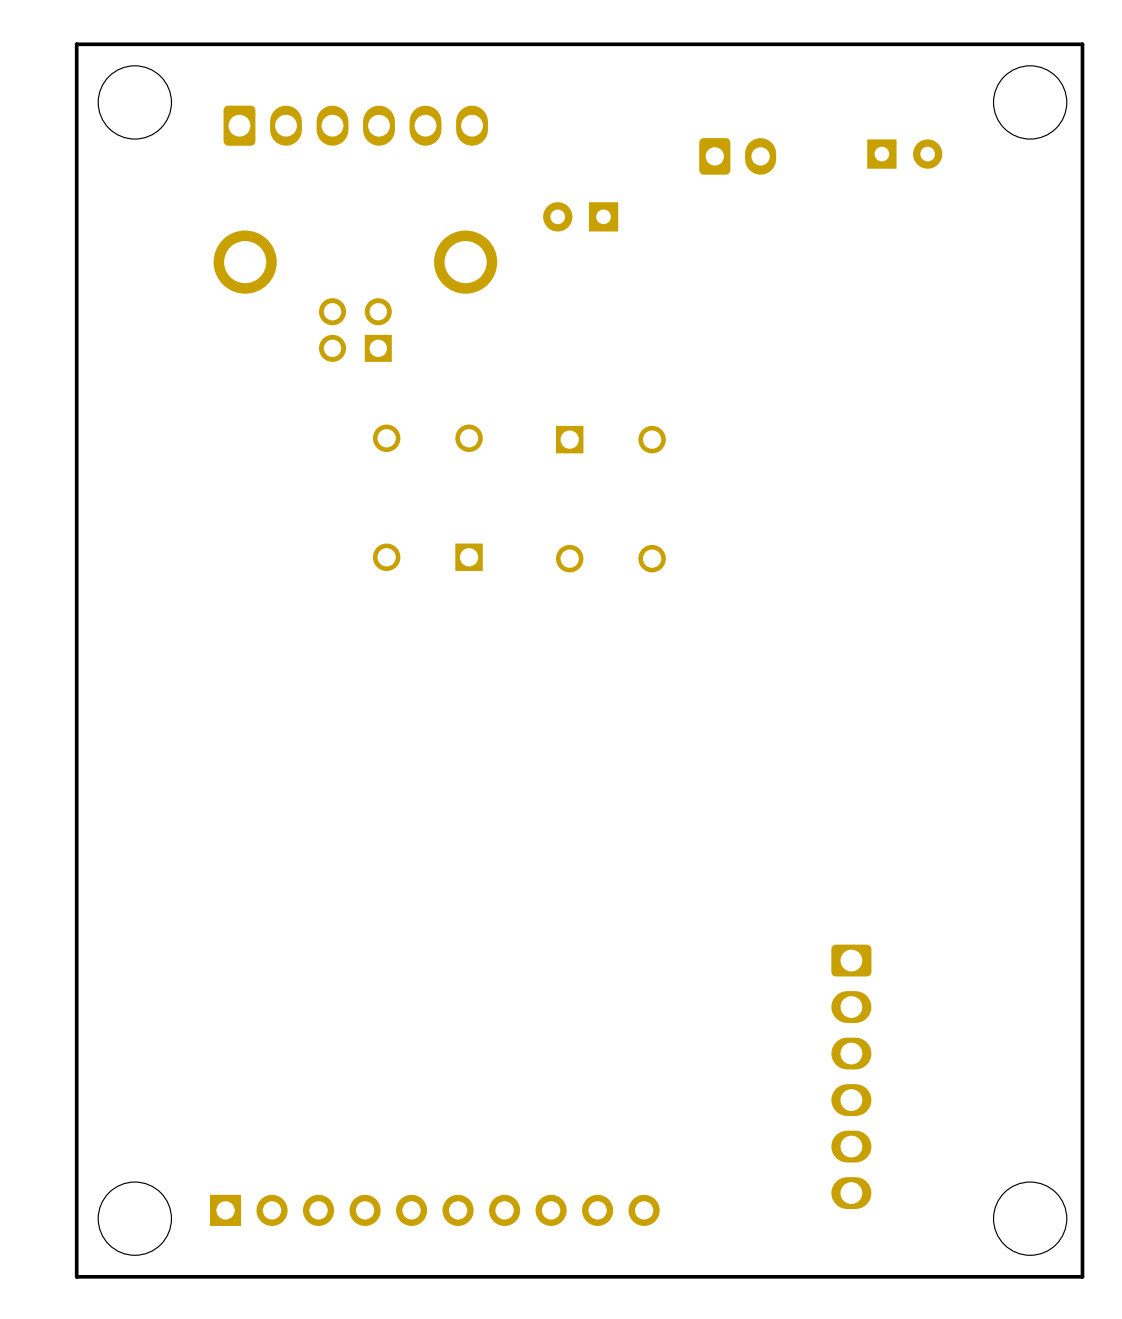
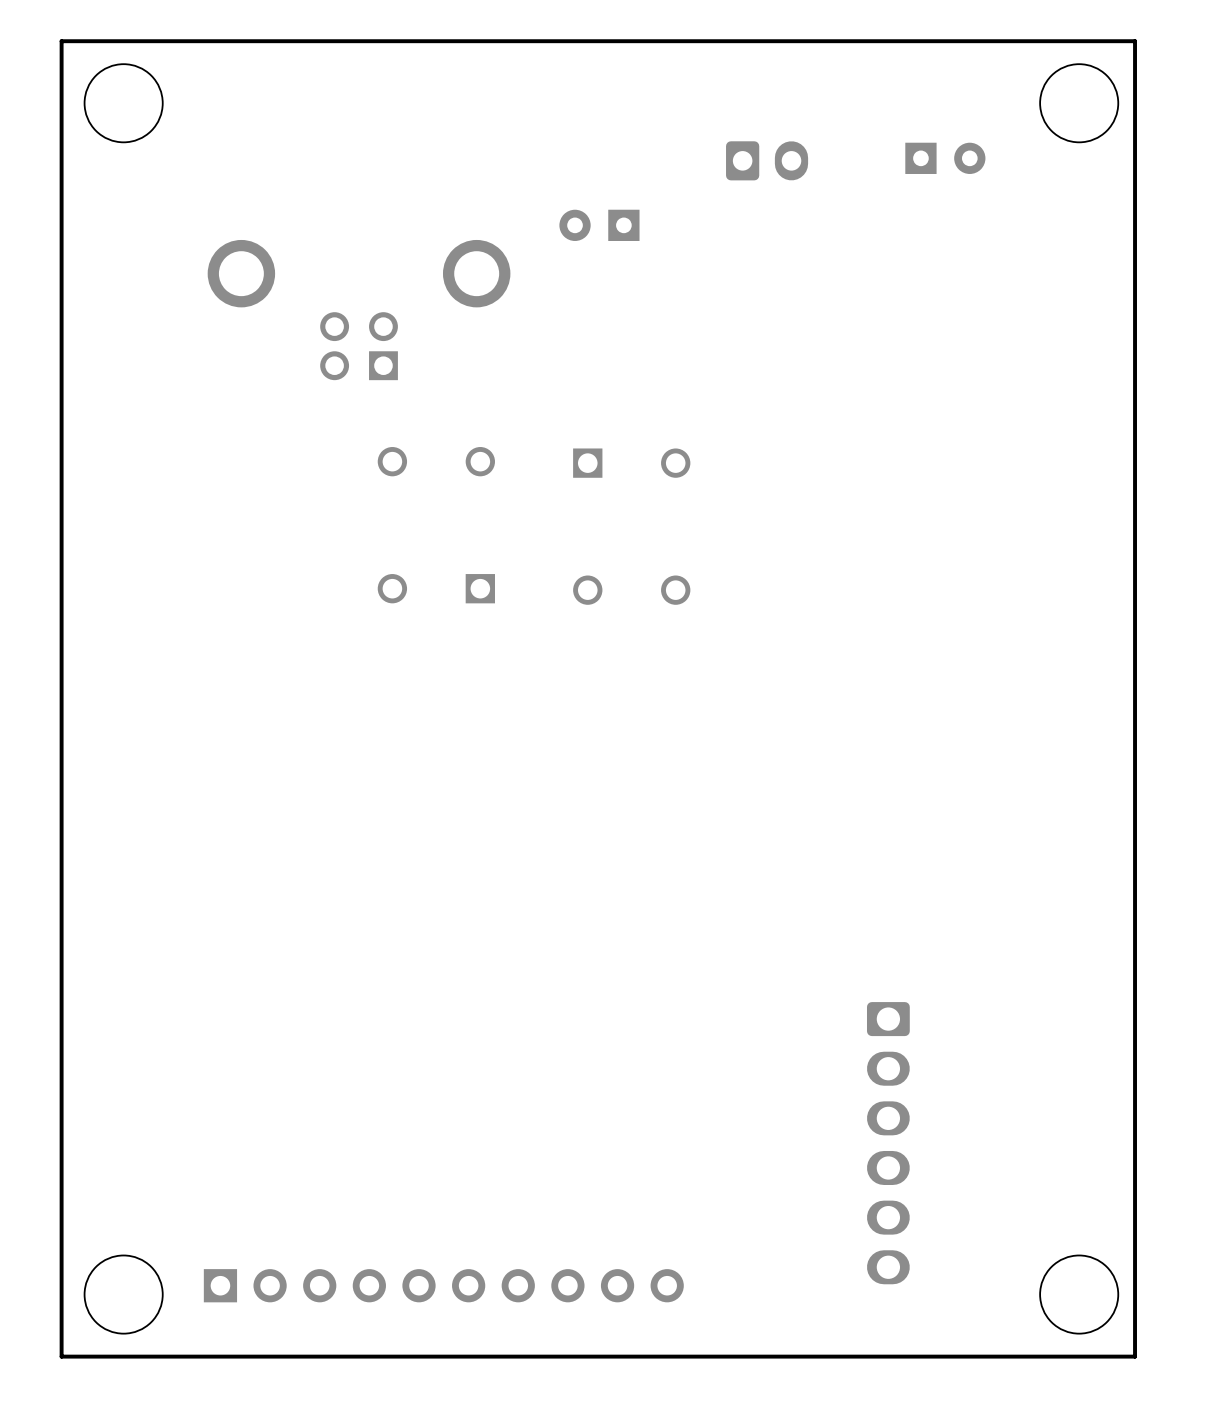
part: (355, 125) -> none

